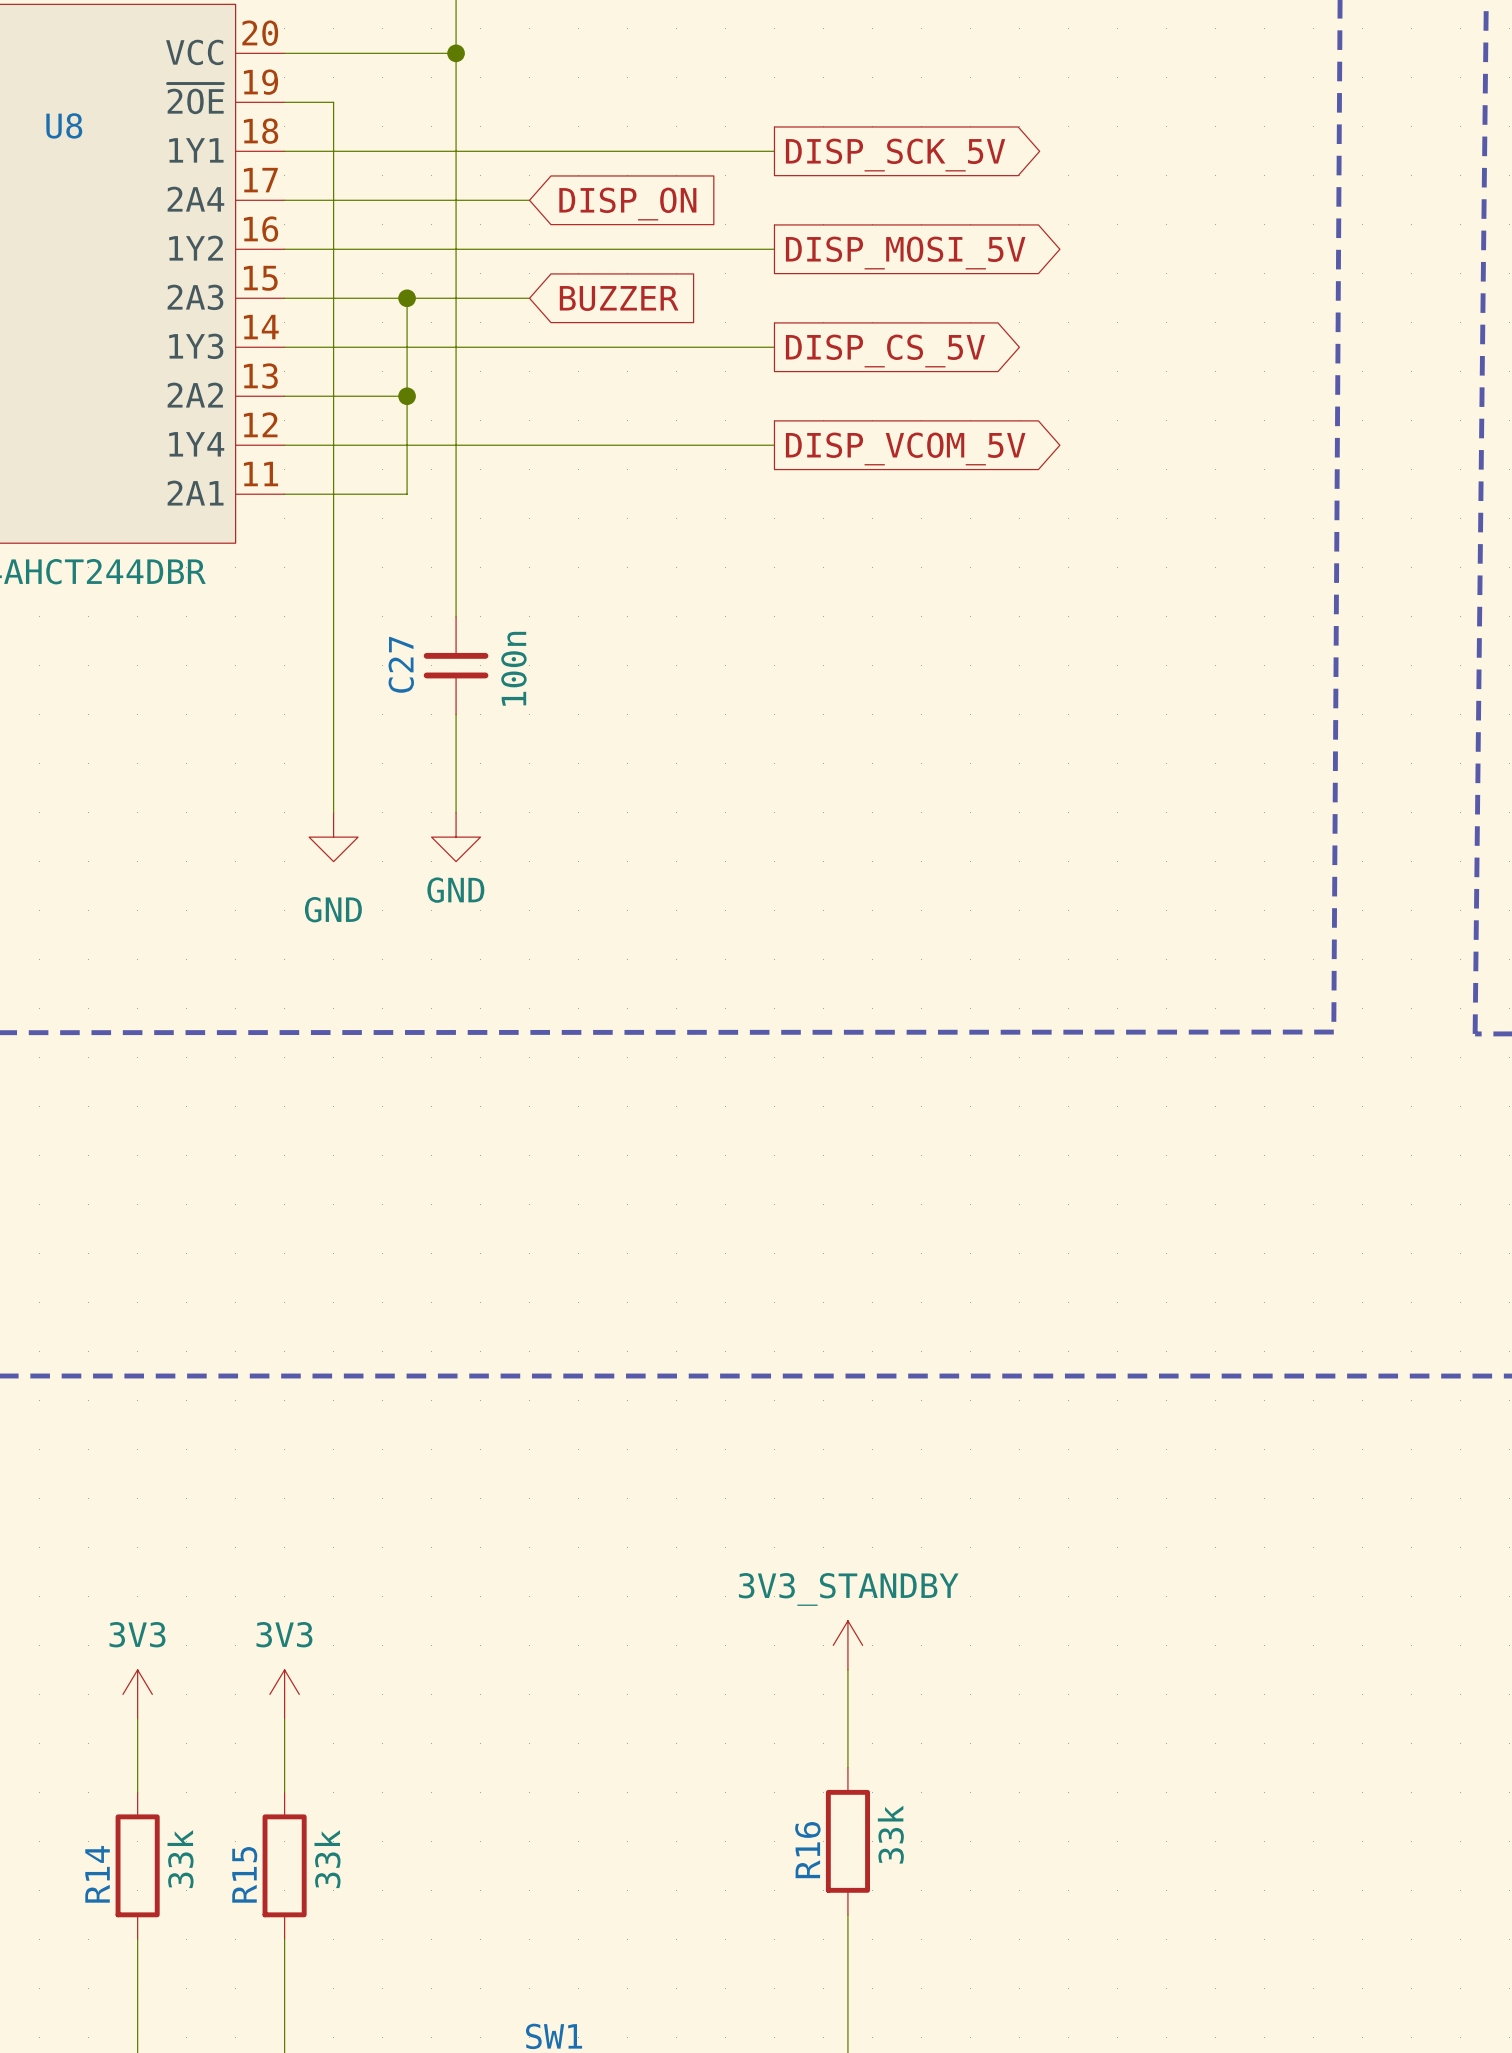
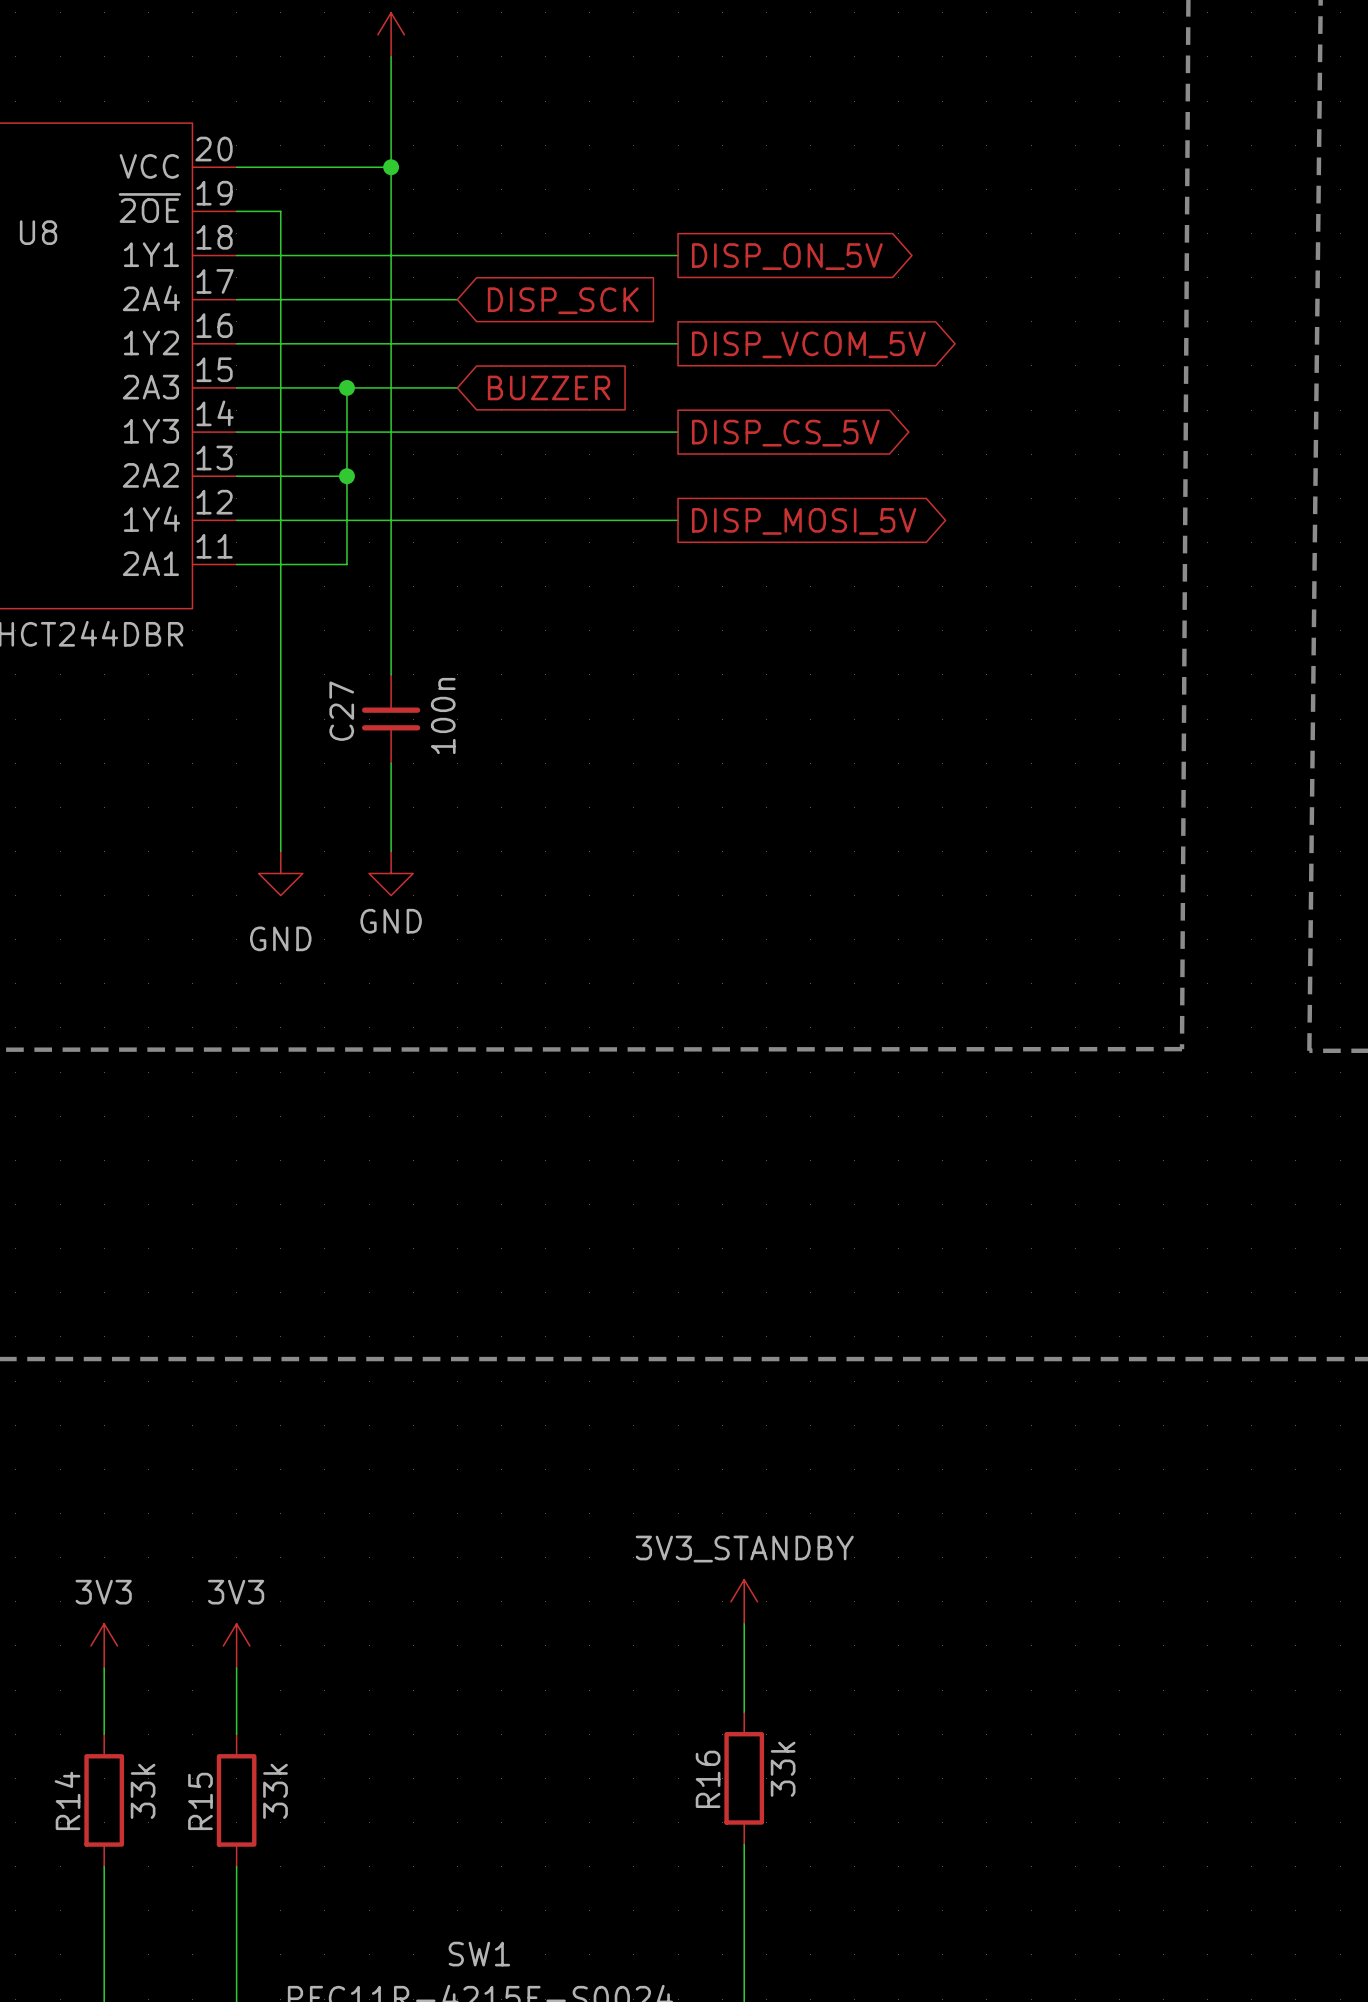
global label: DISP_SCK_5V (895, 155) -> DISP_ON_5V (787, 256)
global label: DISP_ON (627, 204) -> DISP_SCK (563, 300)
global label: DISP_MOSI_5V (905, 253) -> DISP_VCOM_5V (808, 344)
global label: DISP_VCOM_5V (905, 448) -> DISP_MOSI_5V (804, 521)

